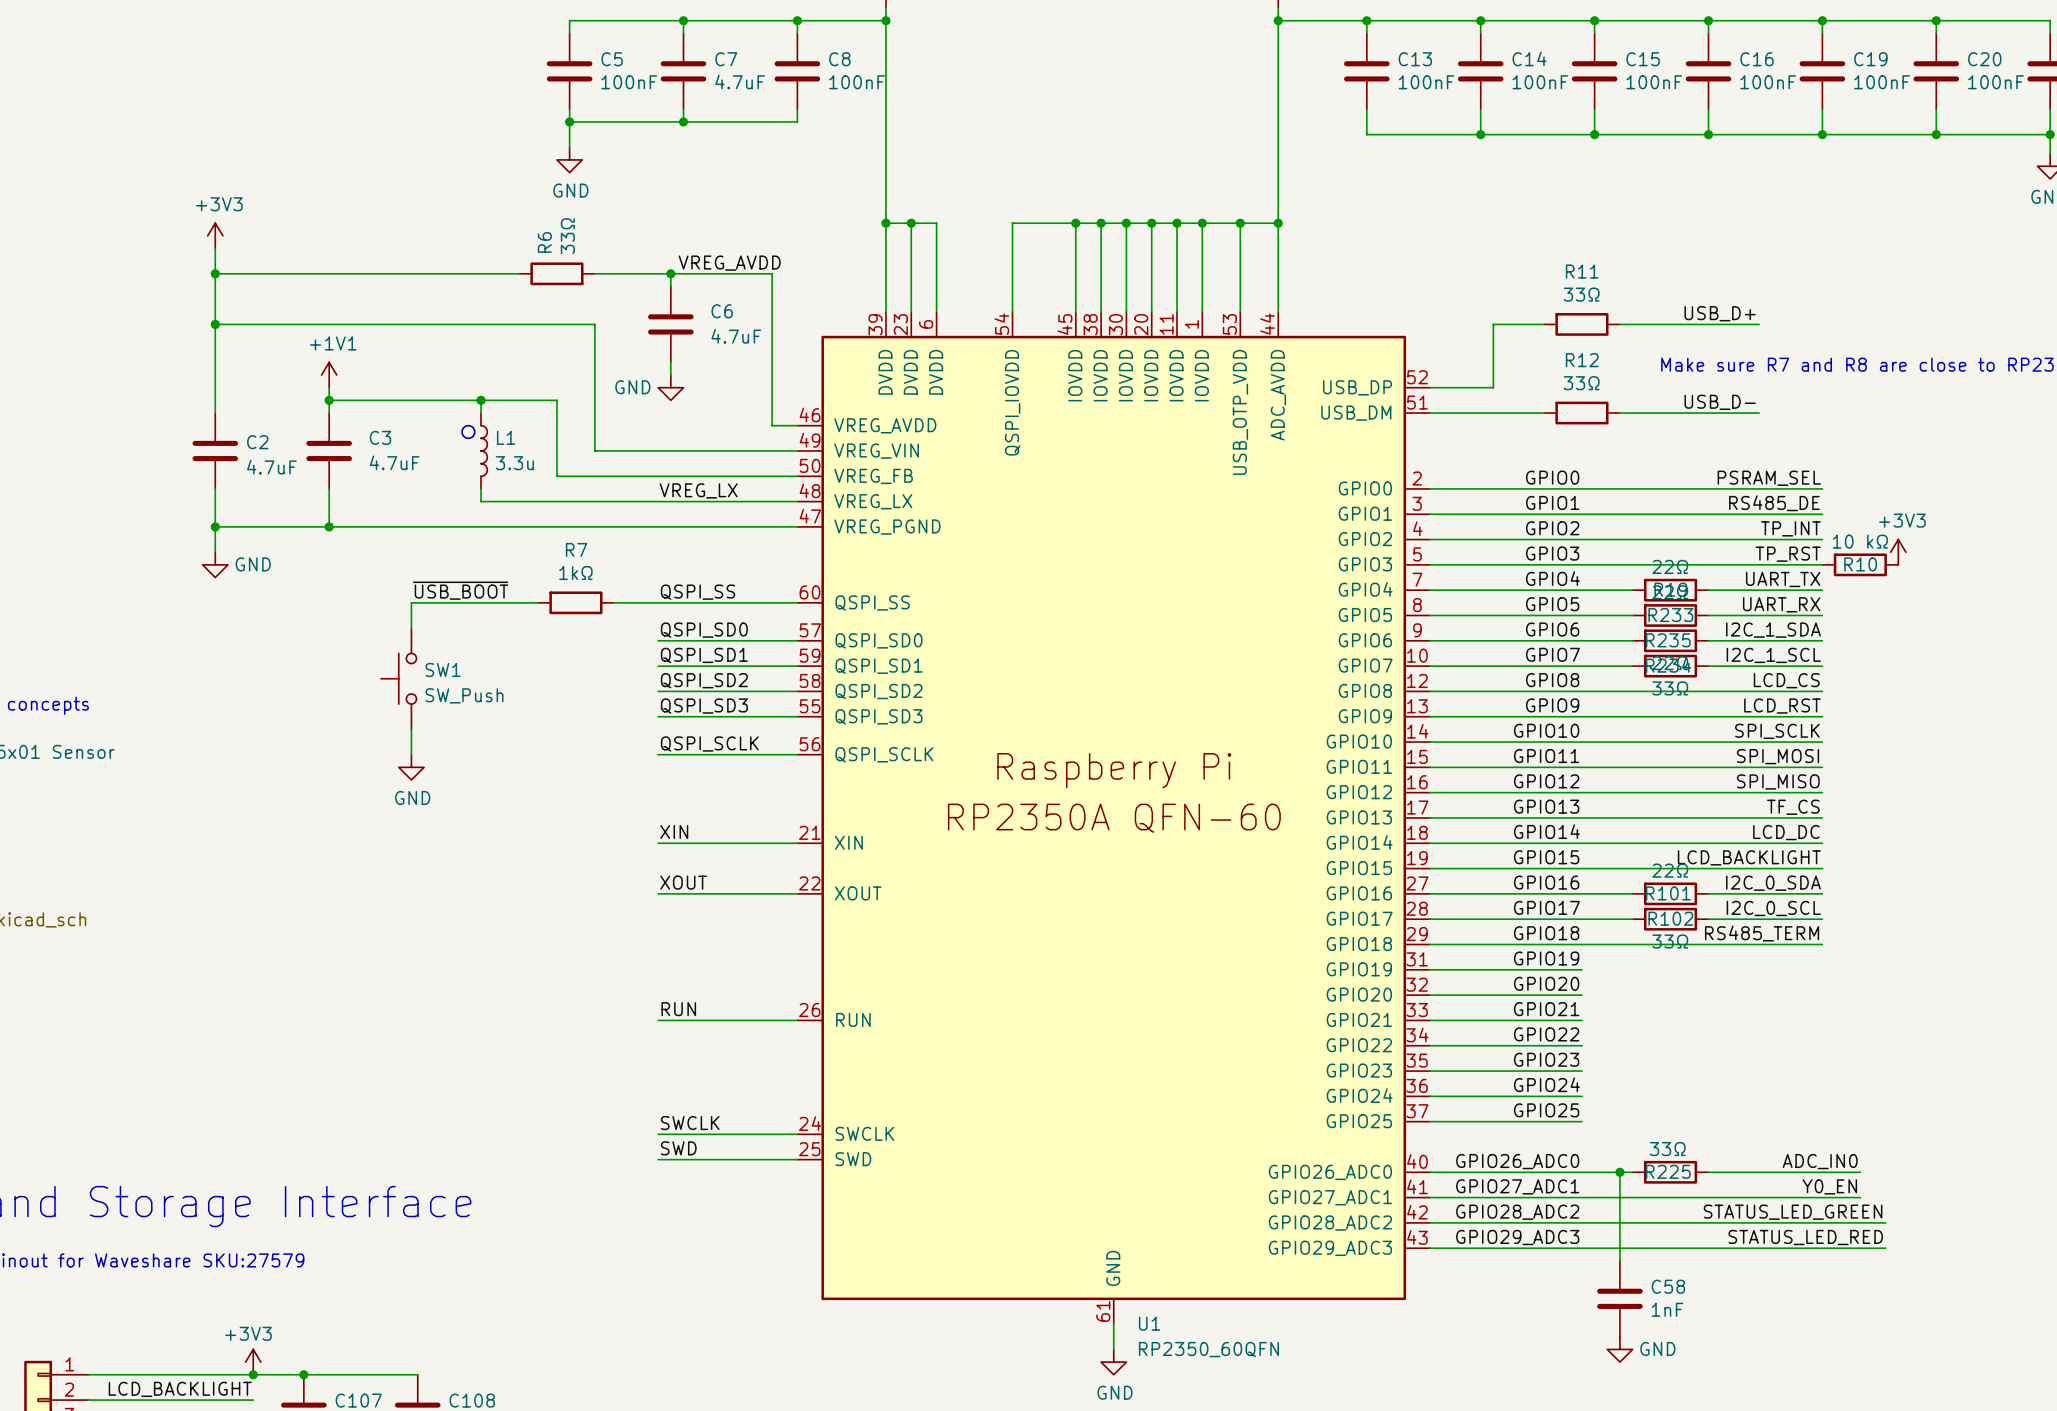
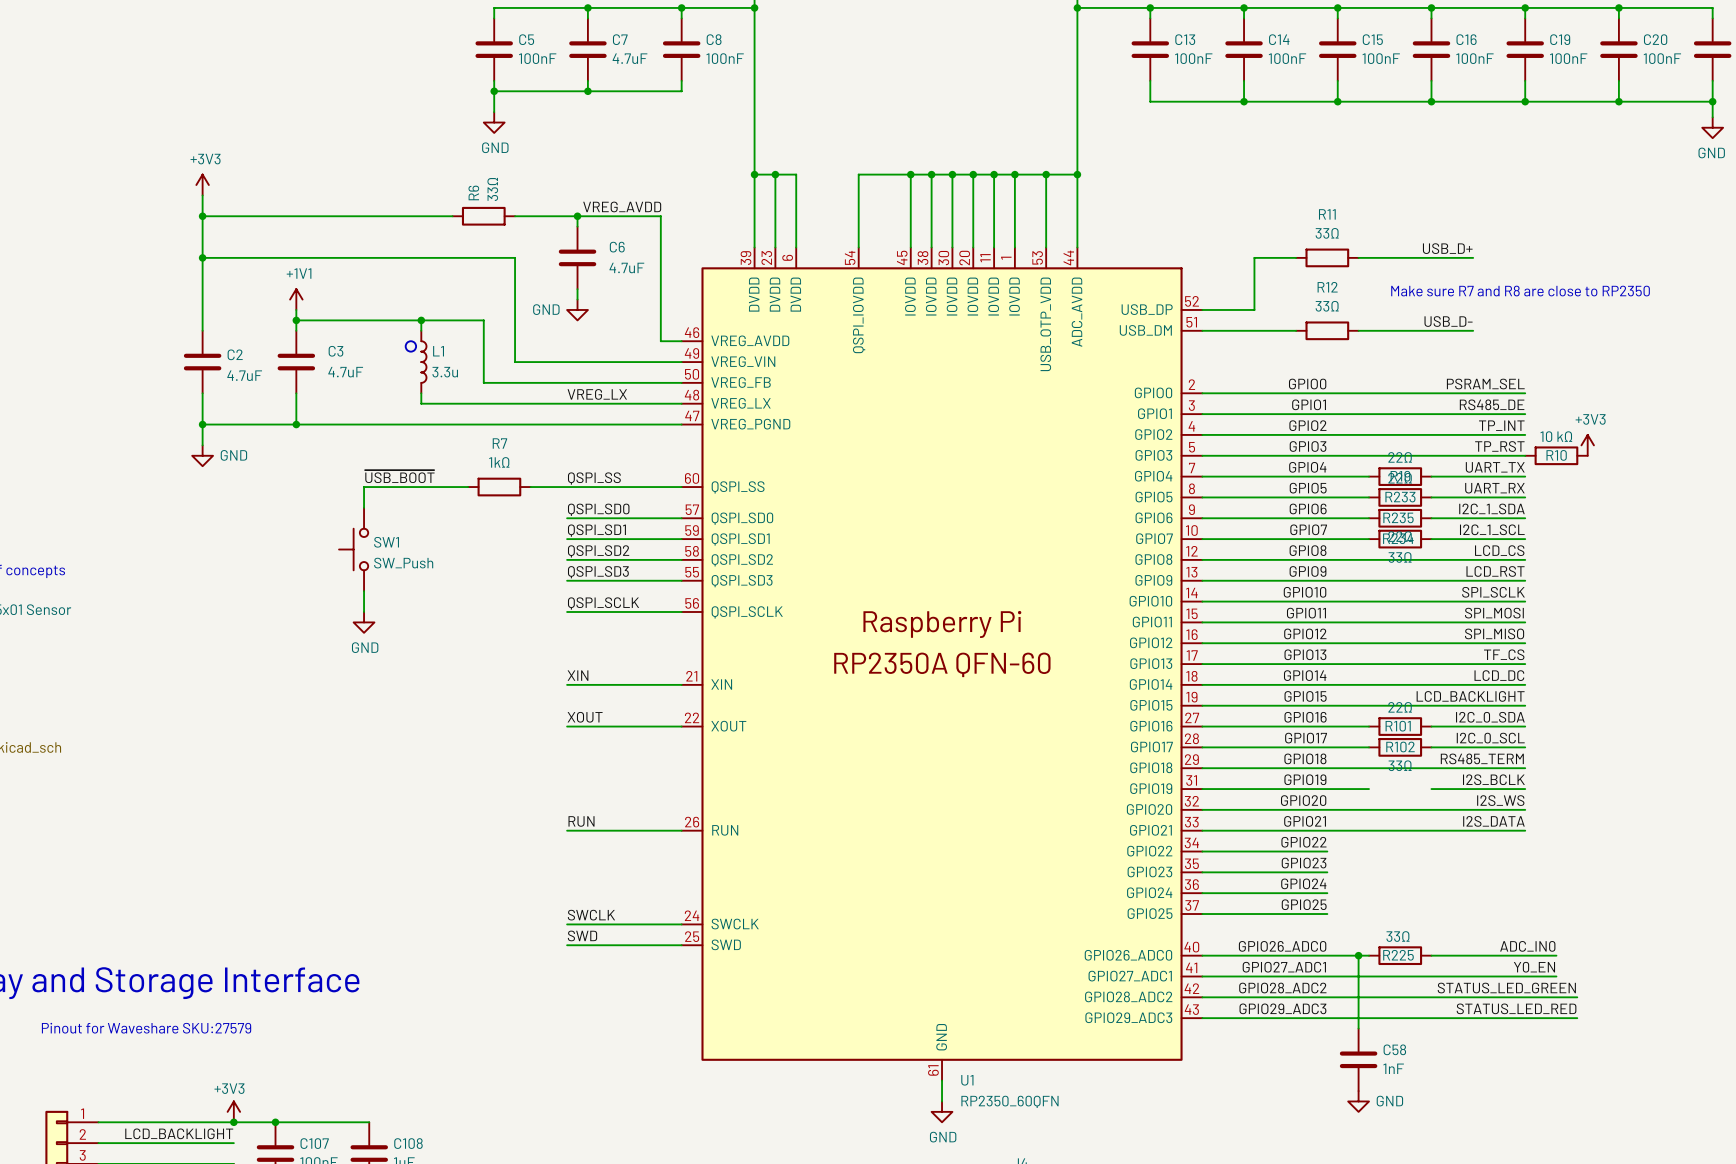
label: none -> I2S_BCLK (1493, 779)
wire: none -> (1327, 789) (1369, 789)
wire: none -> (1431, 789) (1525, 789)
label: none -> I2S_WS (1500, 800)
wire: none -> (1327, 809) (1525, 809)
label: none -> I2S_DATA (1493, 821)
wire: none -> (1327, 830) (1525, 830)

